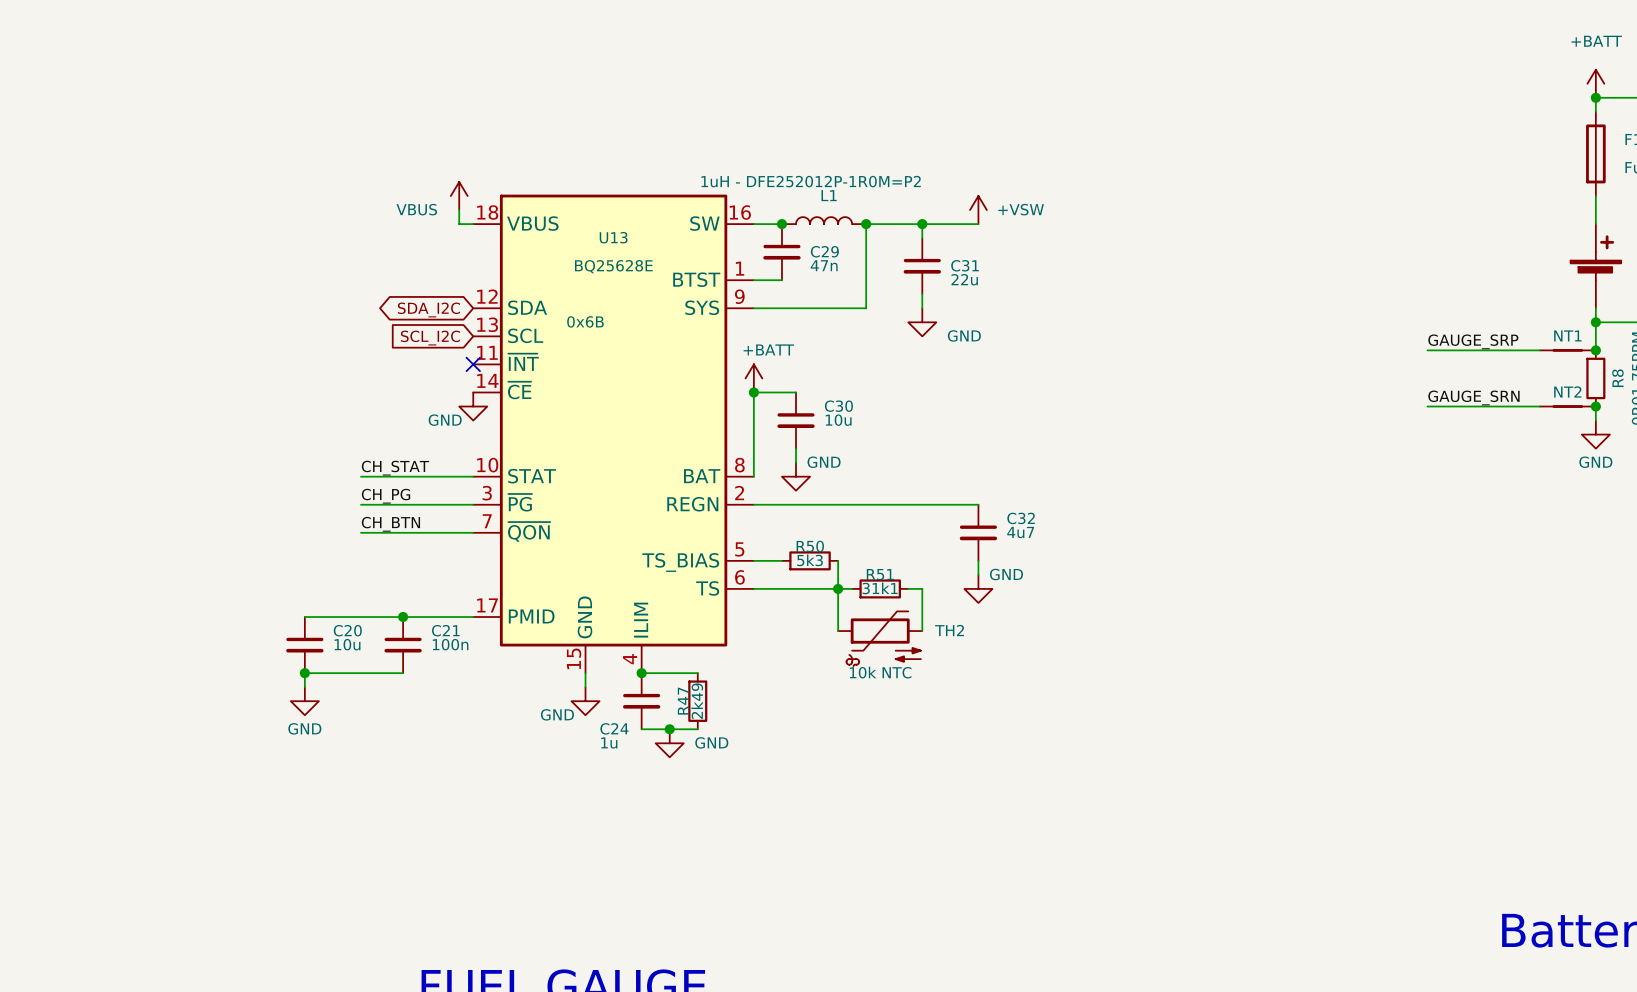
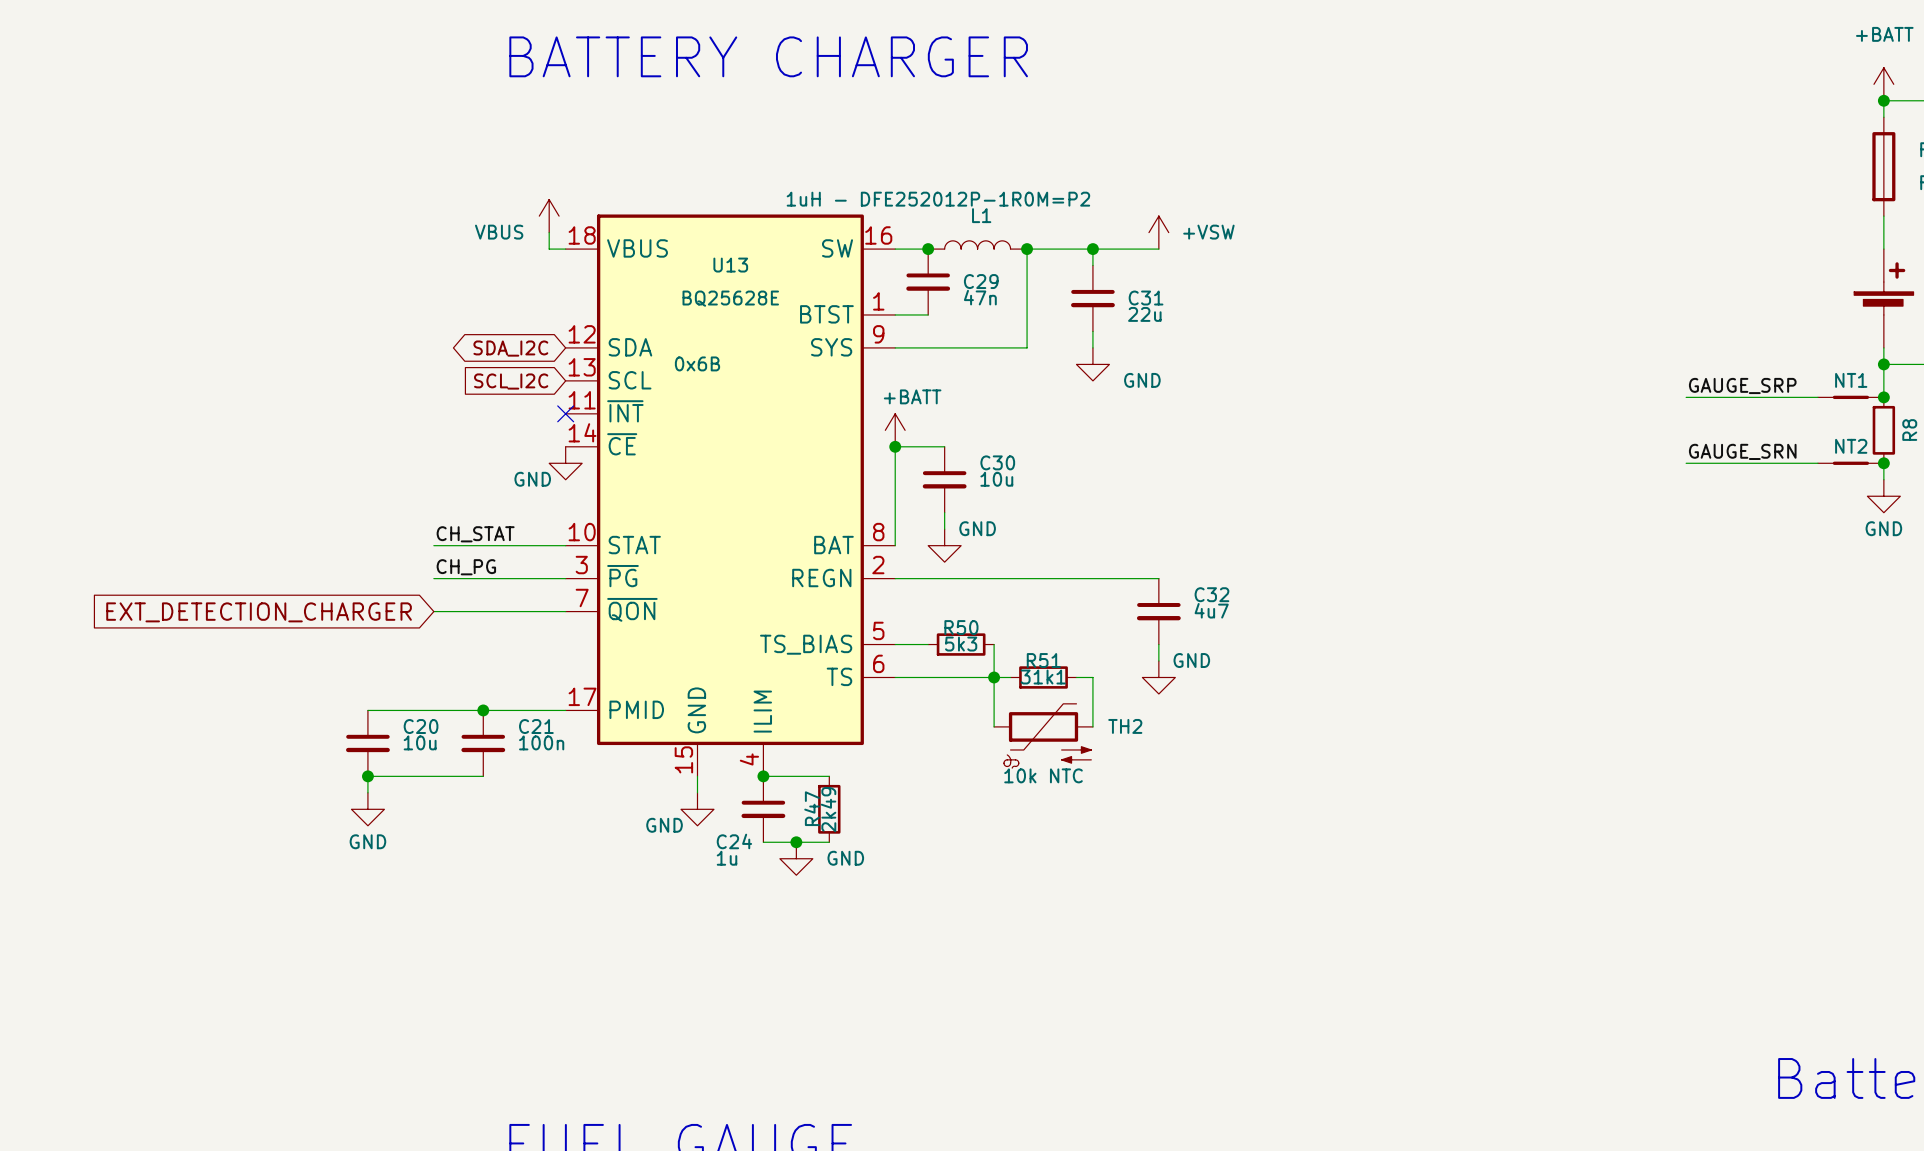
text: none -> BATTERY CHARGER (768, 56)
label: CH_BTN (390, 524) -> none
global label: none -> EXT_DETECTION_CHARGER (259, 612)

